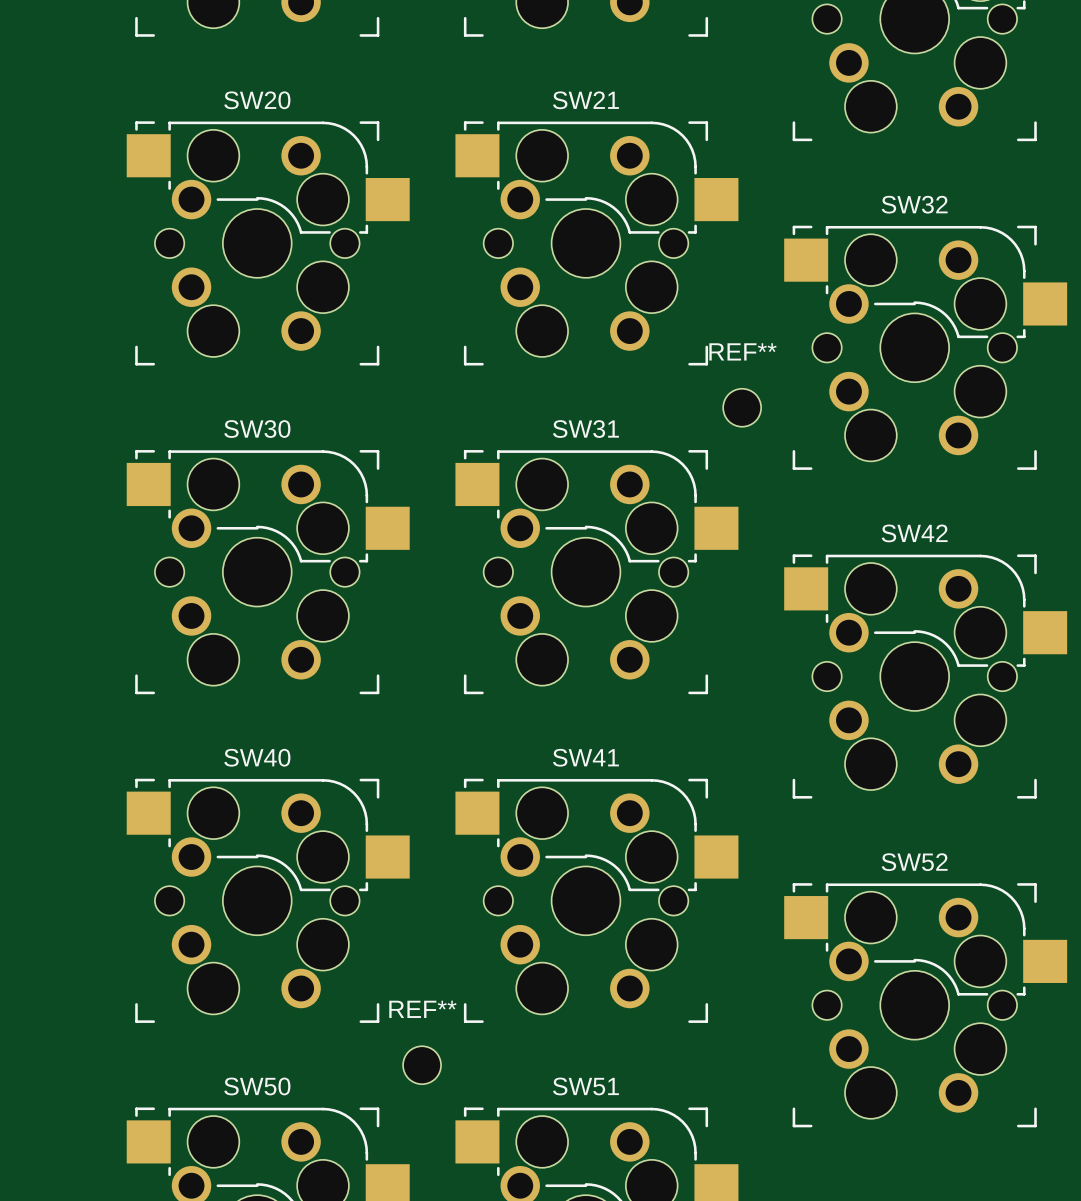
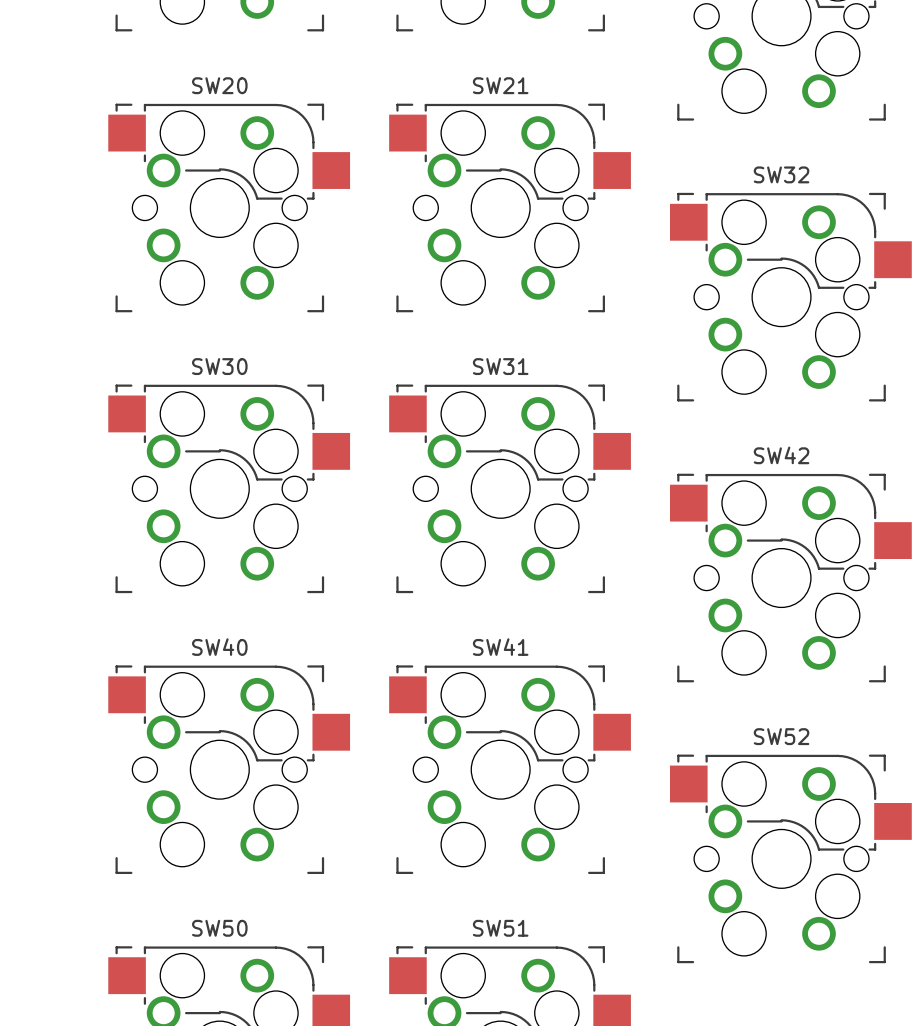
REF**: (742, 407) -> none
REF**: (422, 1065) -> none

